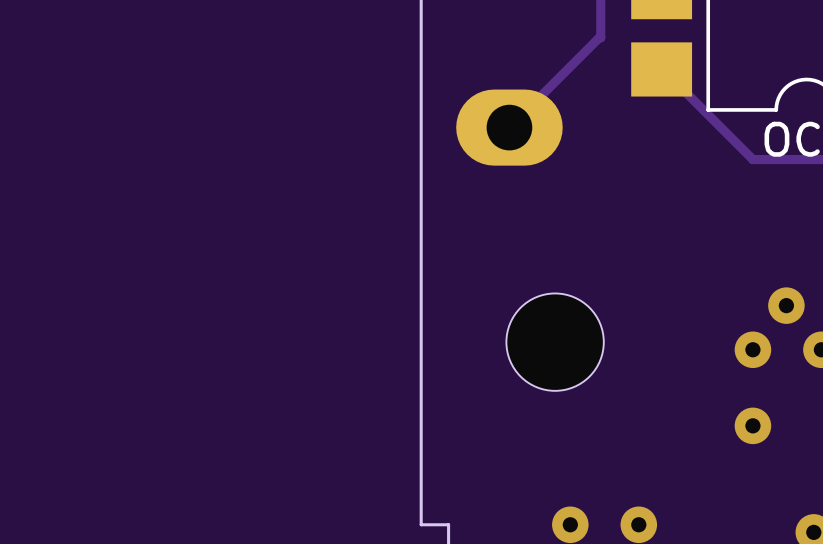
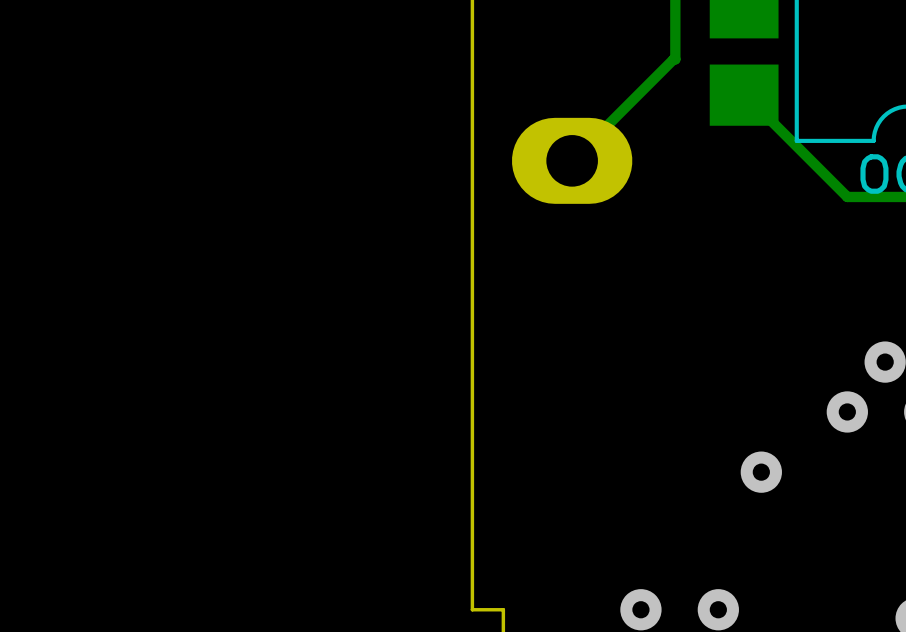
part: (555, 342) -> none
via position: (752, 425) -> (761, 472)

